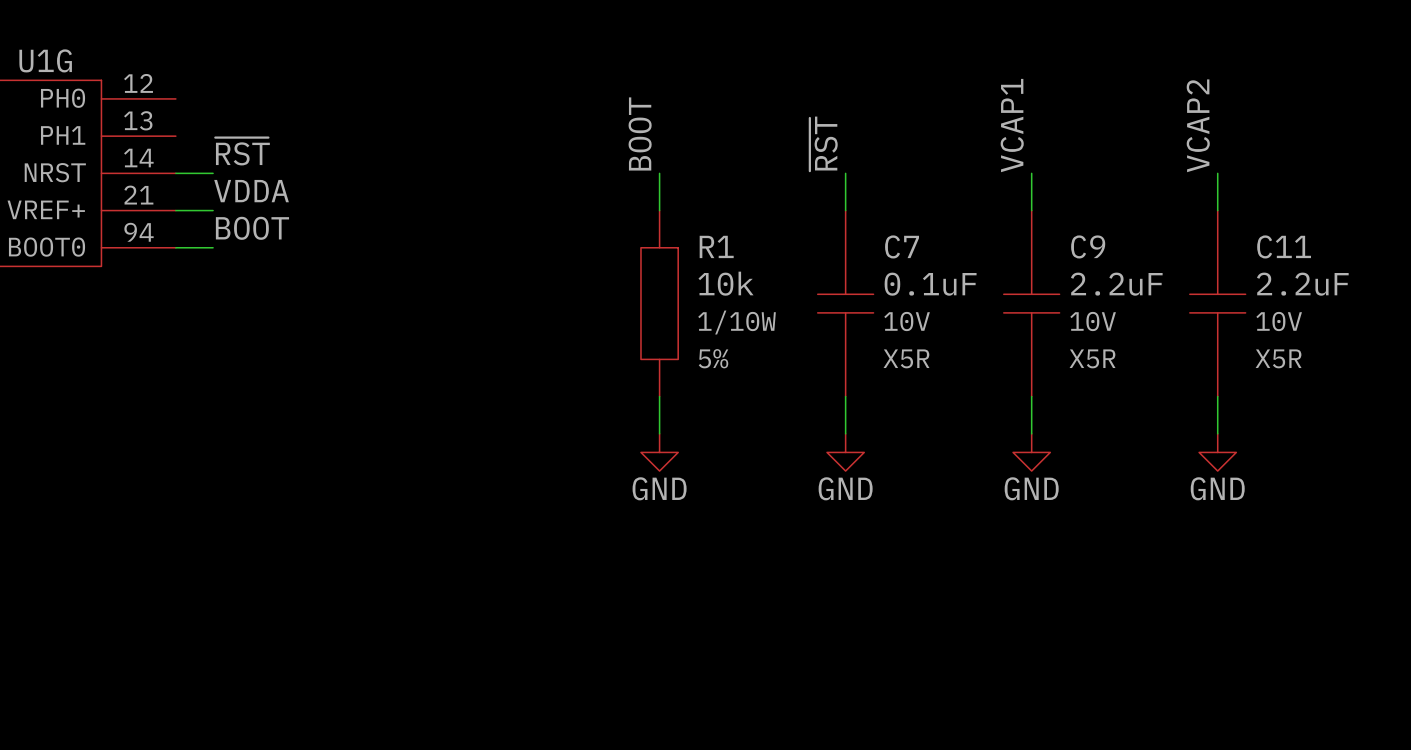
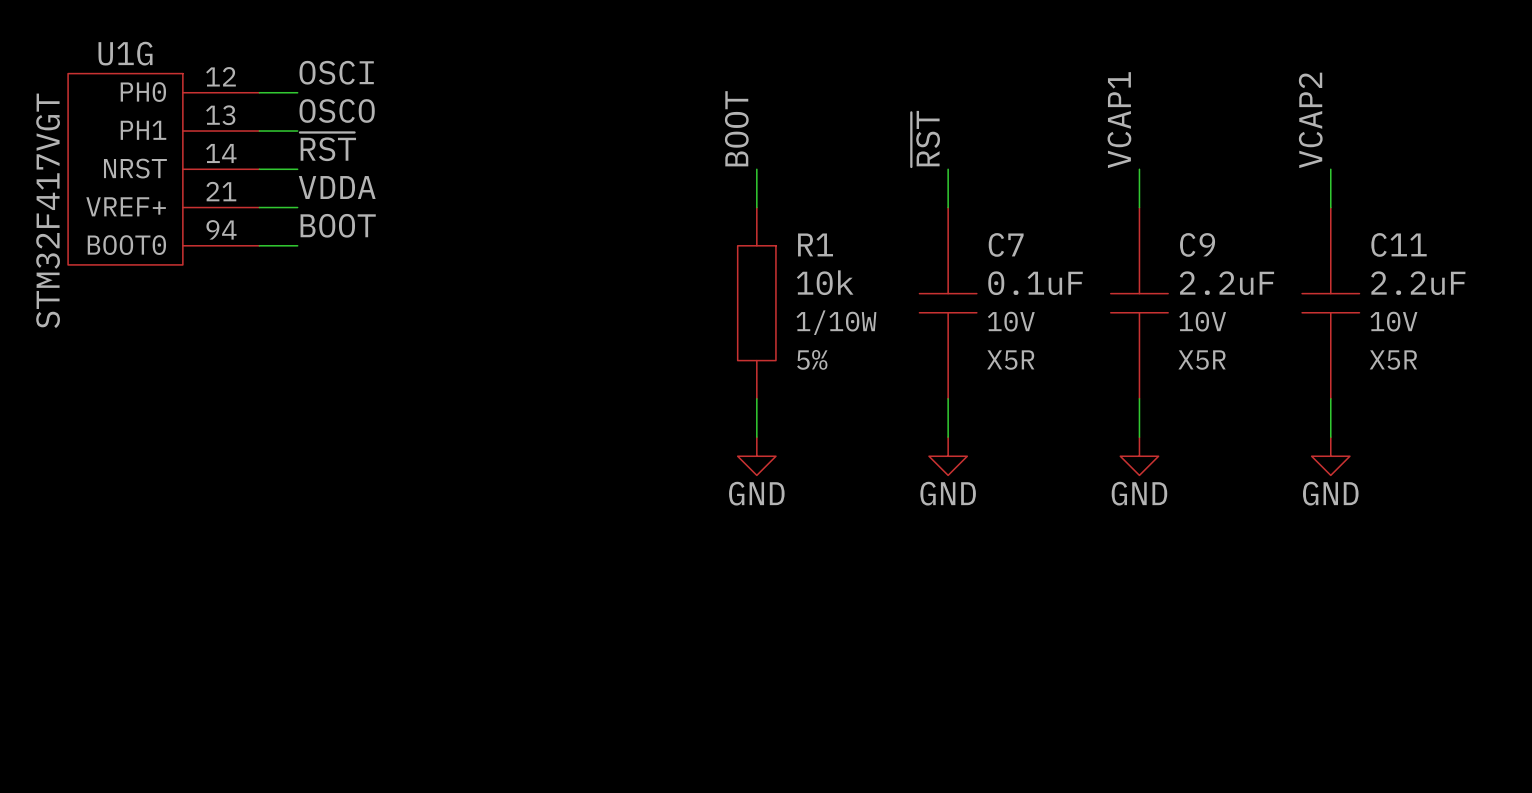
label: none -> OSCI (336, 72)
wire: none -> (259, 92) (297, 92)
label: none -> OSCO (337, 110)
wire: none -> (259, 131) (297, 131)

